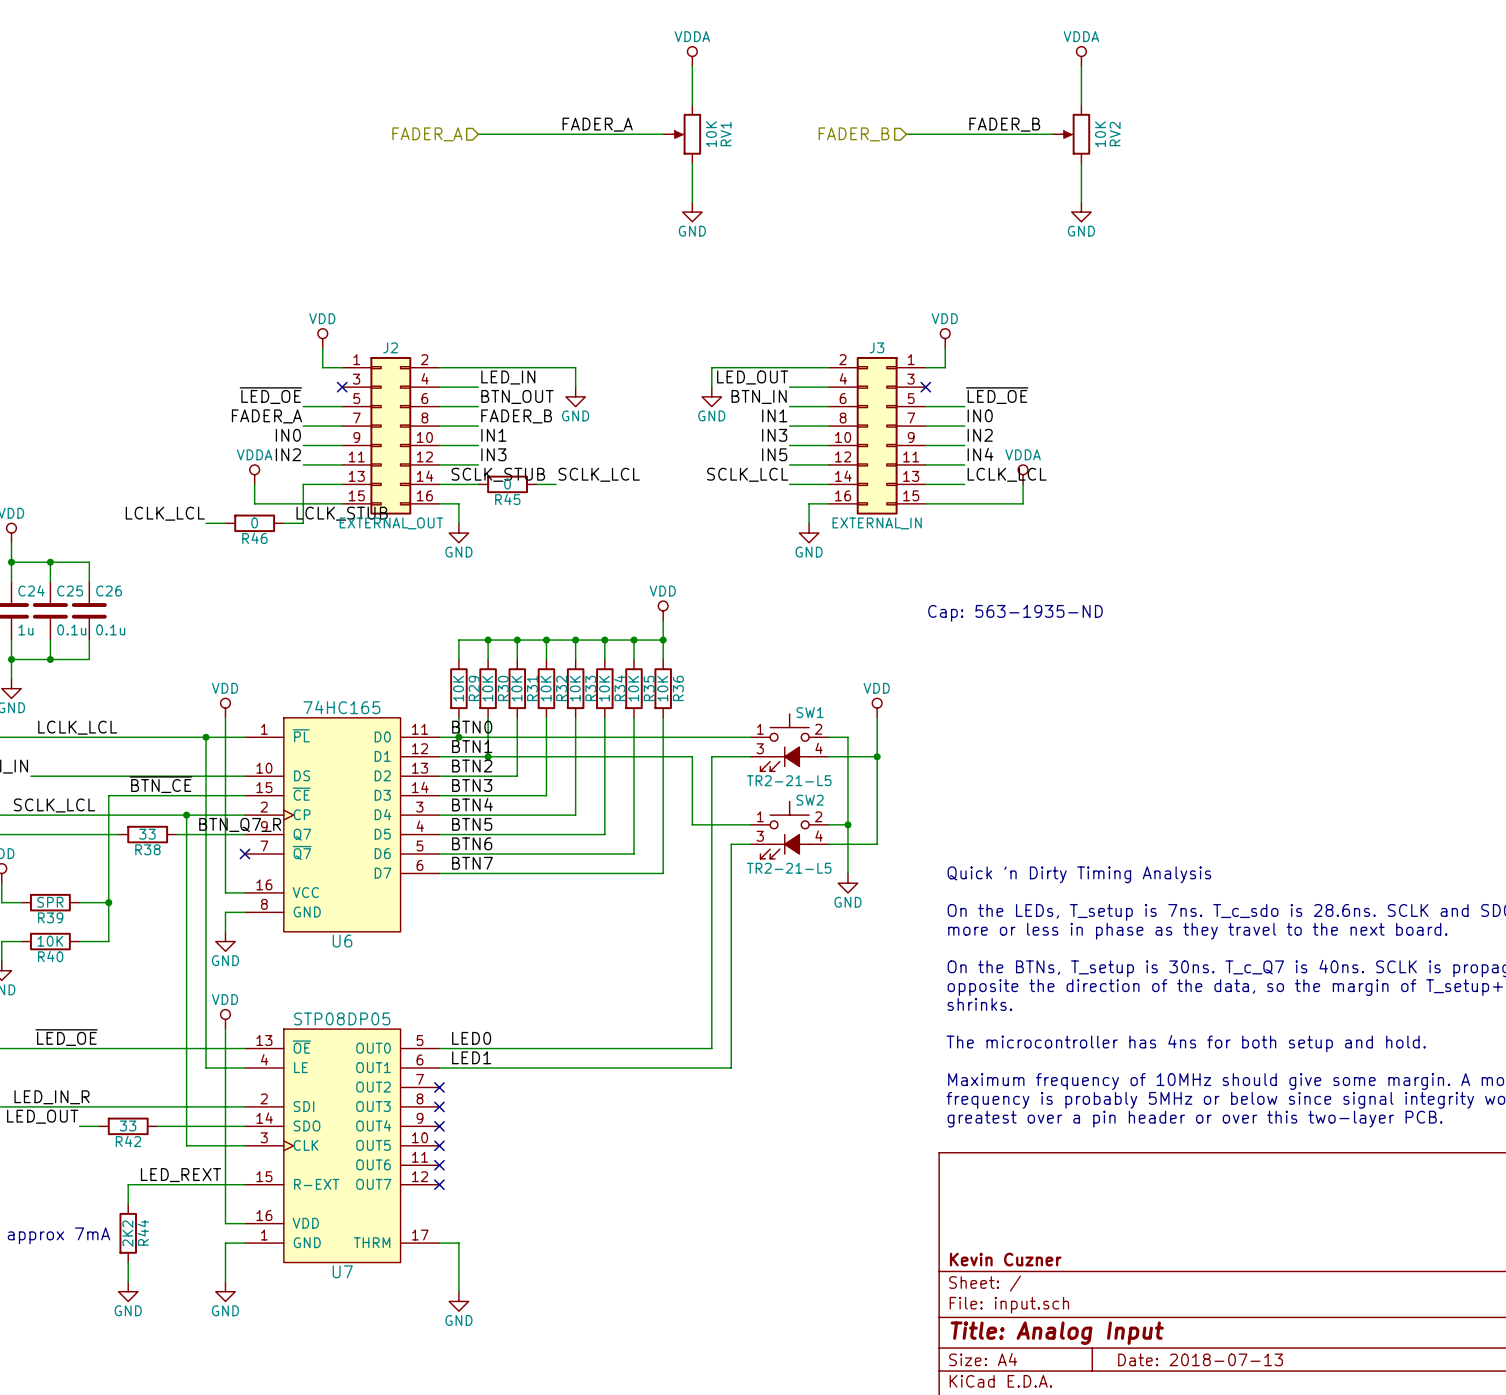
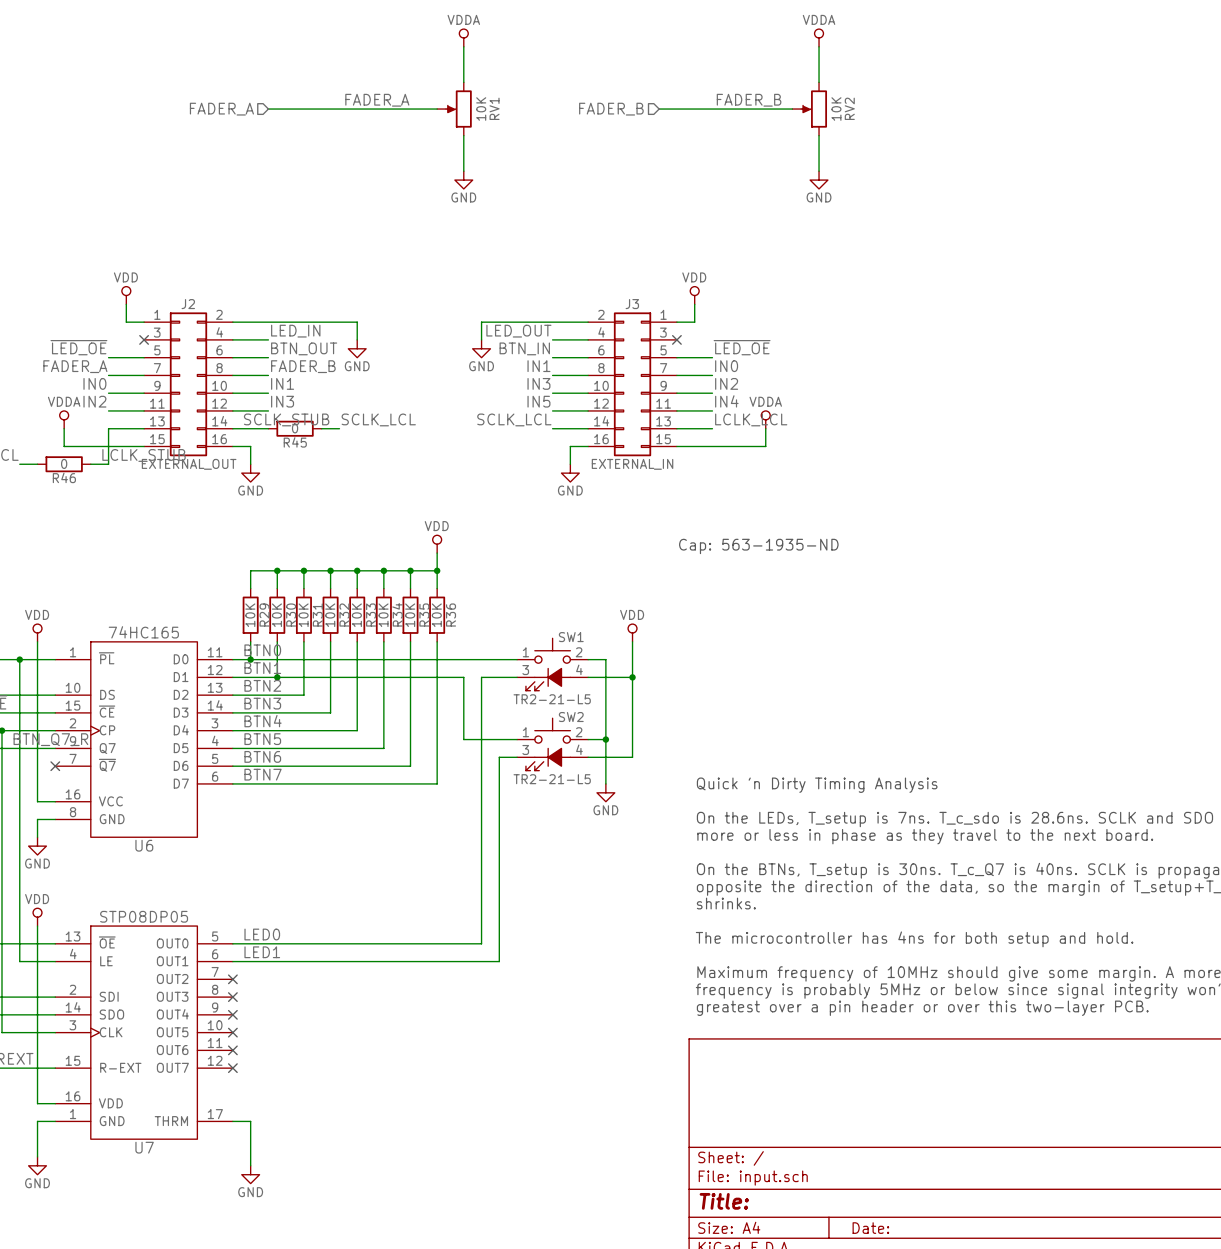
title block: Kevin Cuzner (1005, 1259) -> none
title block: Title: Analog Input (1057, 1333) -> Title: (724, 1201)
title block: Date: 2018-07-13 (1200, 1359) -> Date: (870, 1228)

